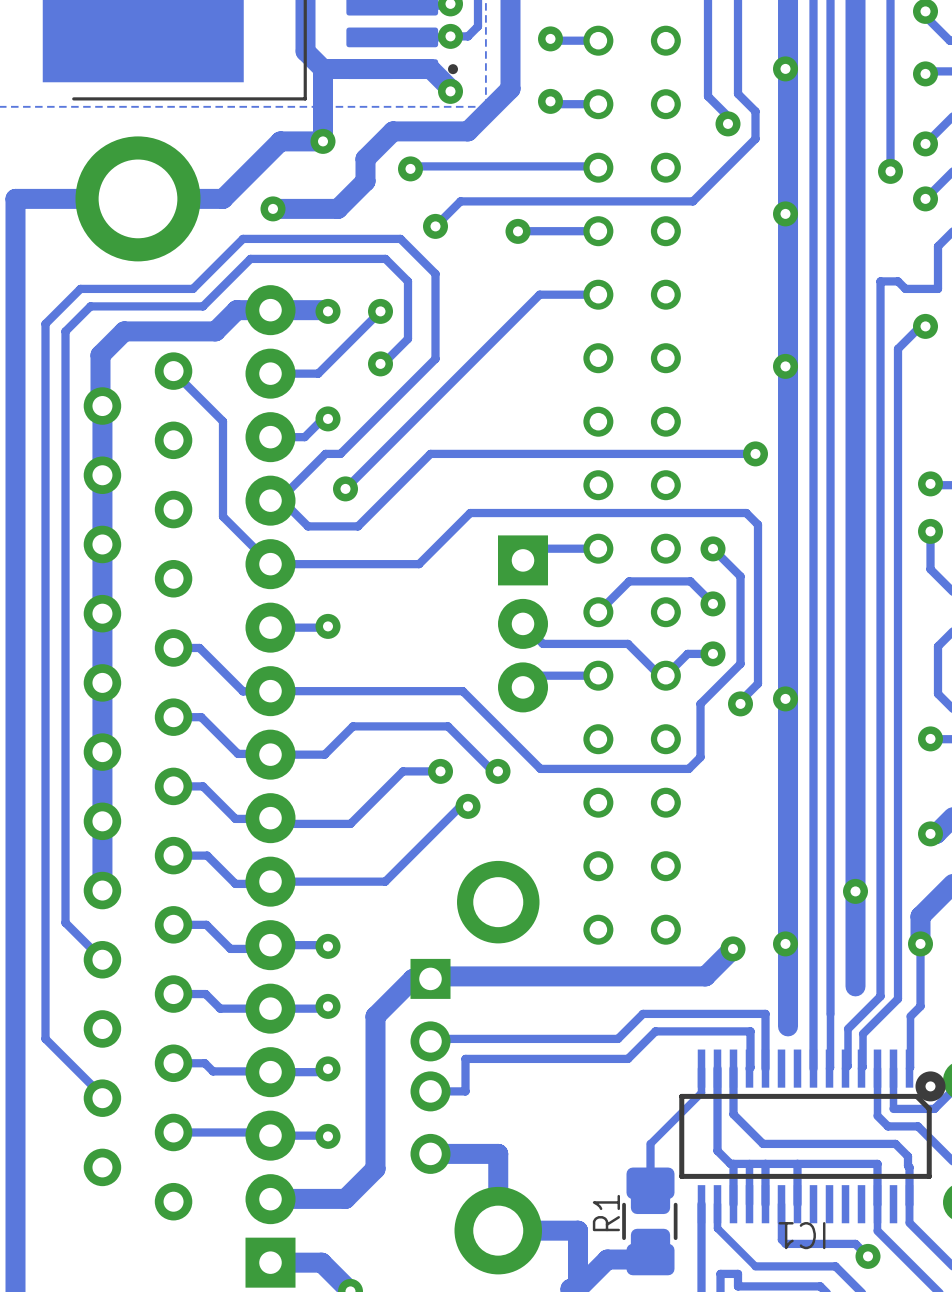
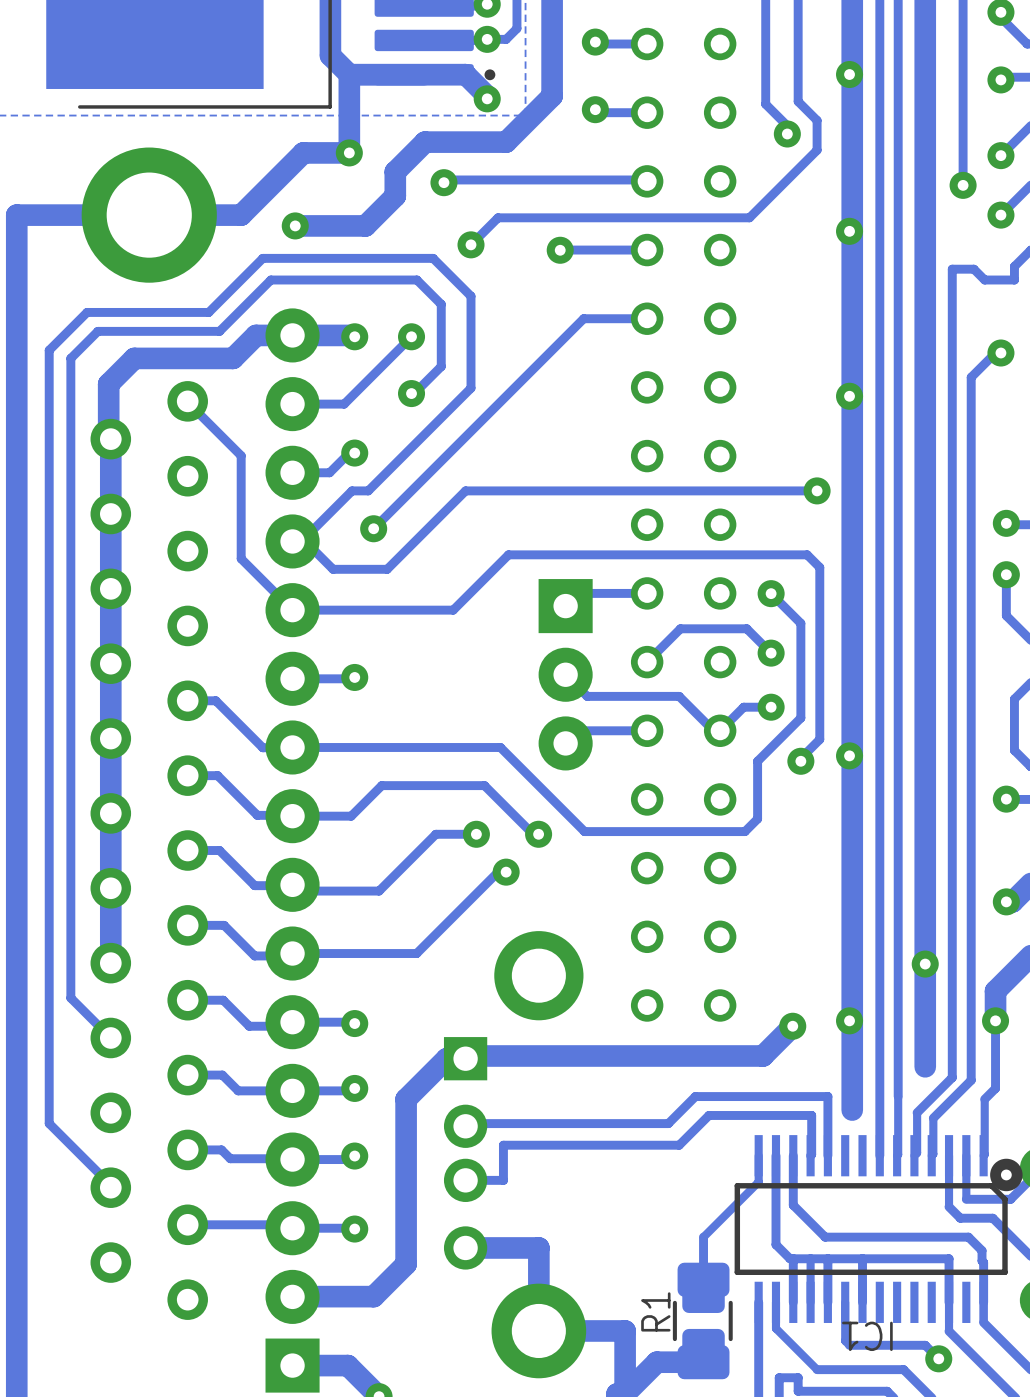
track: (938, 258) (938, 288) (905, 288) (898, 281) (880, 281) -> (1014, 280) (984, 280) (973, 269) (952, 269) (952, 304)

